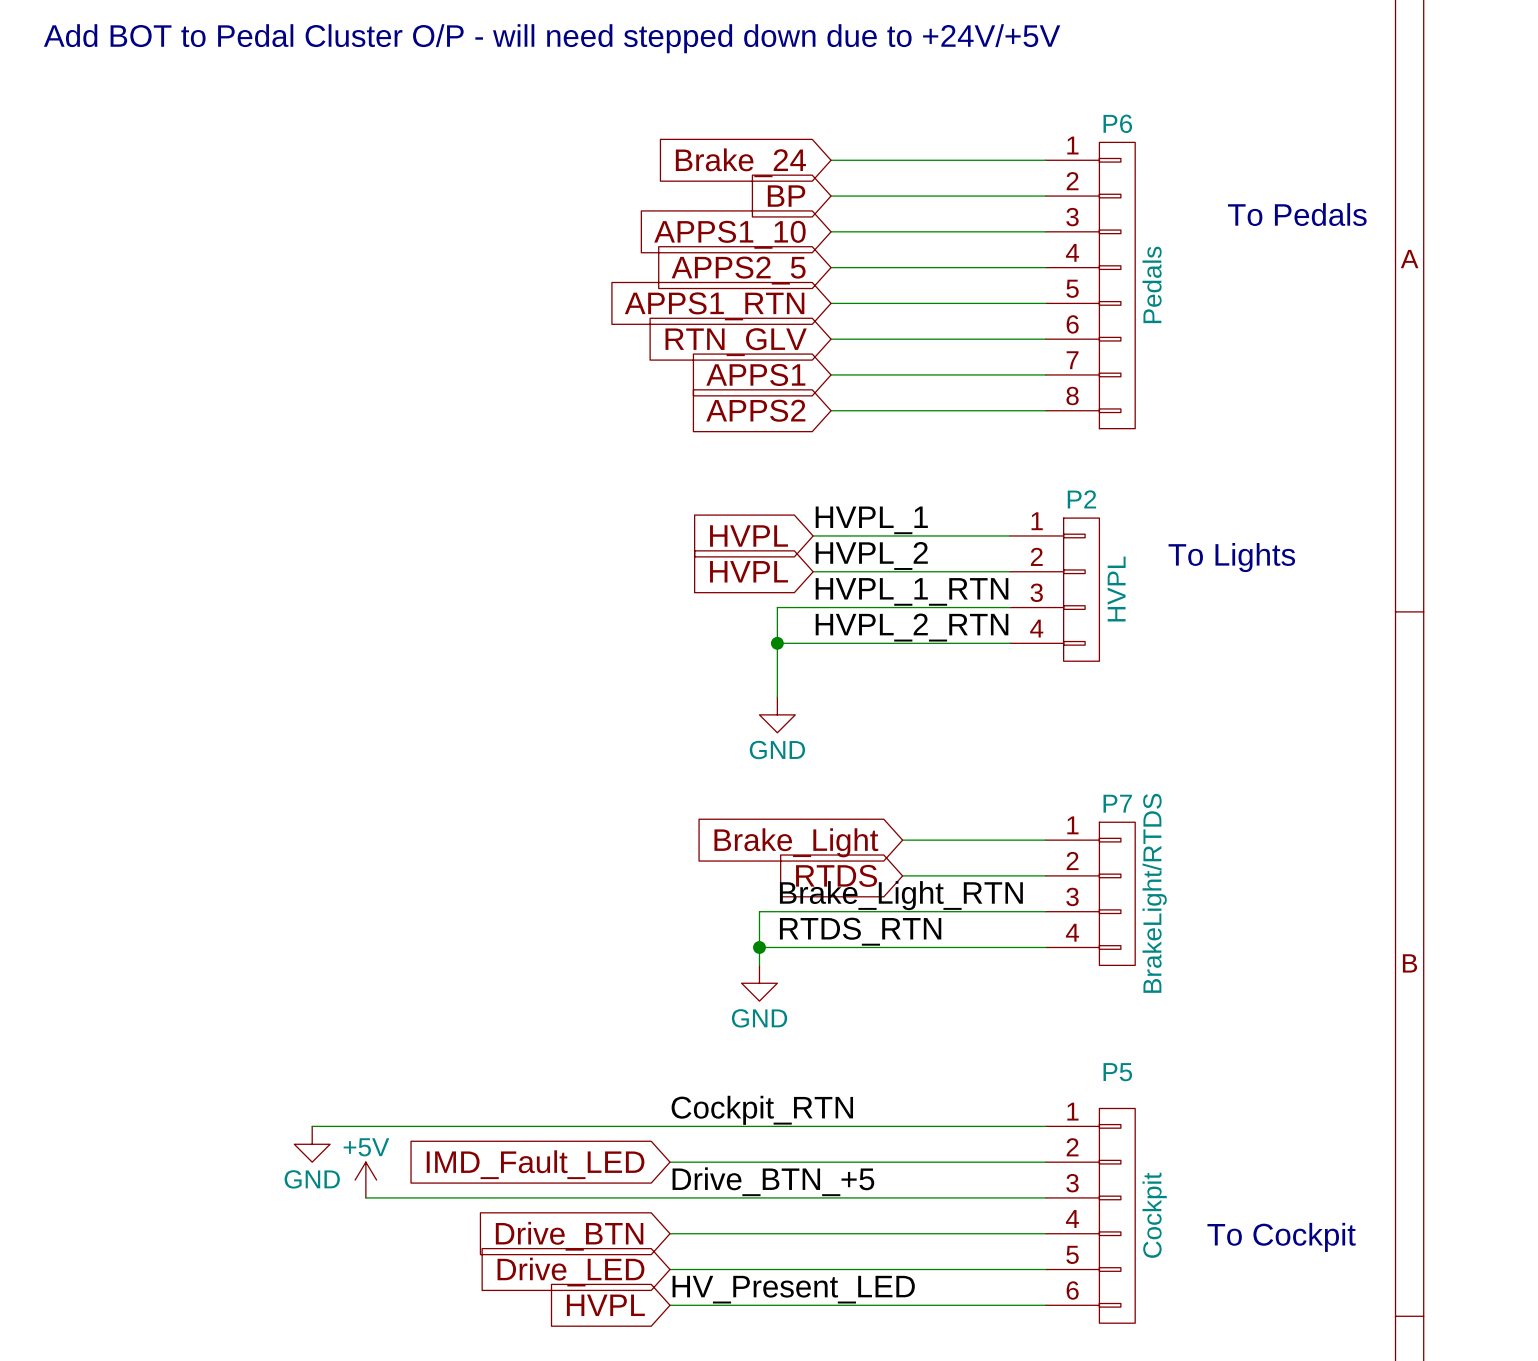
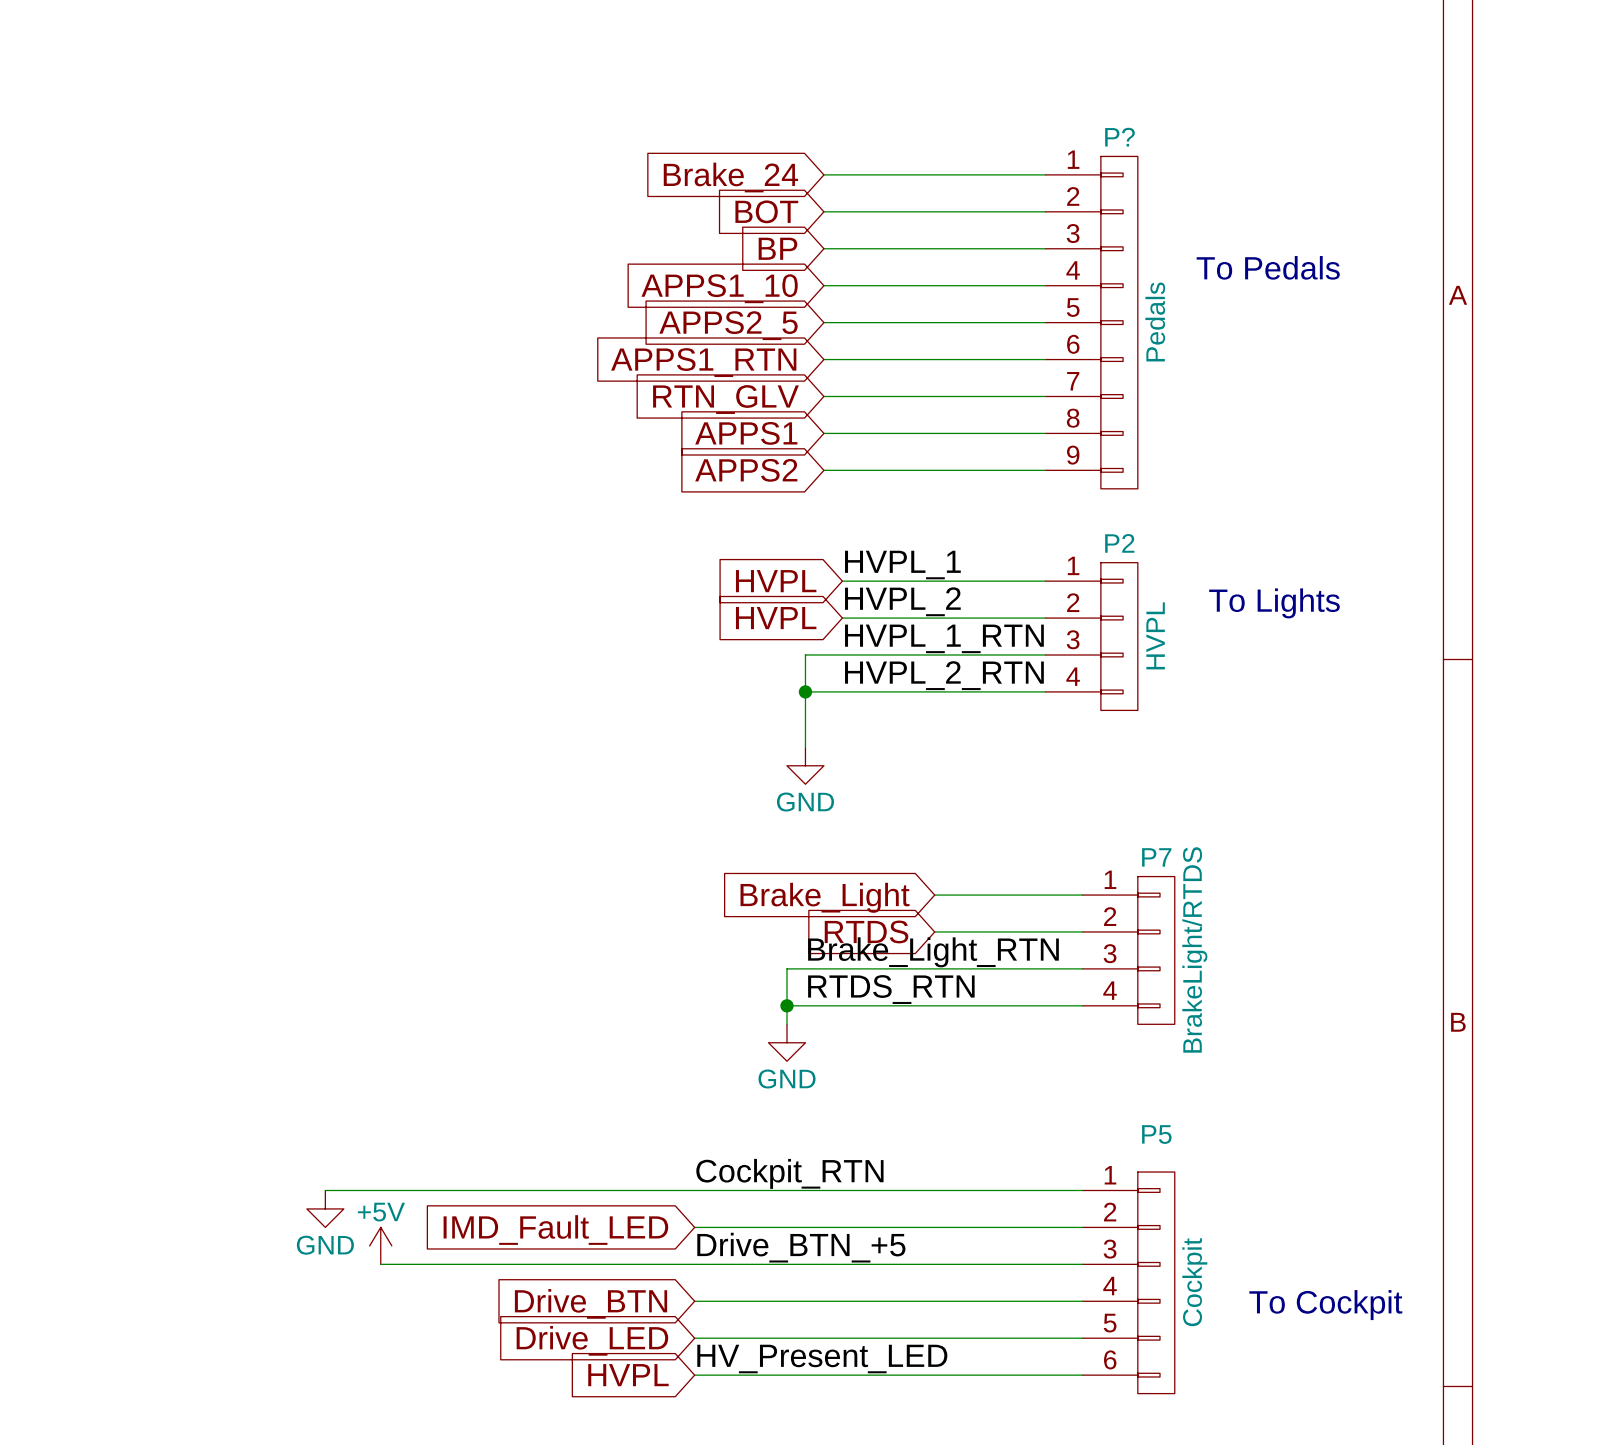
text: Add BOT to Pedal Cluster O/P - will need stepped down due to +24V/+5V (552, 38) -> none
wire: (831, 160) (1045, 160) -> (823, 174) (1045, 174)
global label position: Brake_24 (740, 162) -> Brake_24 (730, 177)
global label: none -> BOT (766, 211)
global label position: BP (786, 196) -> BP (777, 248)
wire: (831, 196) (1045, 196) -> (823, 211) (1045, 211)
wire: none -> (823, 248) (1045, 248)
text position: To Pedals (1297, 214) -> To Pedals (1268, 267)
wire: (831, 231) (1045, 231) -> (823, 285) (1045, 285)
global label position: APPS1_10 (729, 234) -> APPS1_10 (719, 288)
wire: (831, 267) (1045, 267) -> (823, 322) (1045, 322)
global label position: APPS2_5 (738, 270) -> APPS2_5 (728, 325)
P?: none -> Pedals (1091, 322)
P6: Pedals (1090, 285) -> none
wire: (831, 303) (1045, 303) -> (823, 359) (1045, 359)
global label position: APPS1_RTN (714, 306) -> APPS1_RTN (703, 362)
wire: (831, 339) (1045, 339) -> (823, 396) (1045, 396)
global label position: RTN_GLV (736, 342) -> RTN_GLV (725, 399)
global label position: APPS1 (755, 374) -> APPS1 (746, 433)
wire: (831, 374) (1045, 374) -> (823, 470) (1045, 470)
global label position: APPS2 (755, 410) -> APPS2 (746, 470)
wire: (831, 410) (1045, 410) -> (823, 433) (1045, 433)

